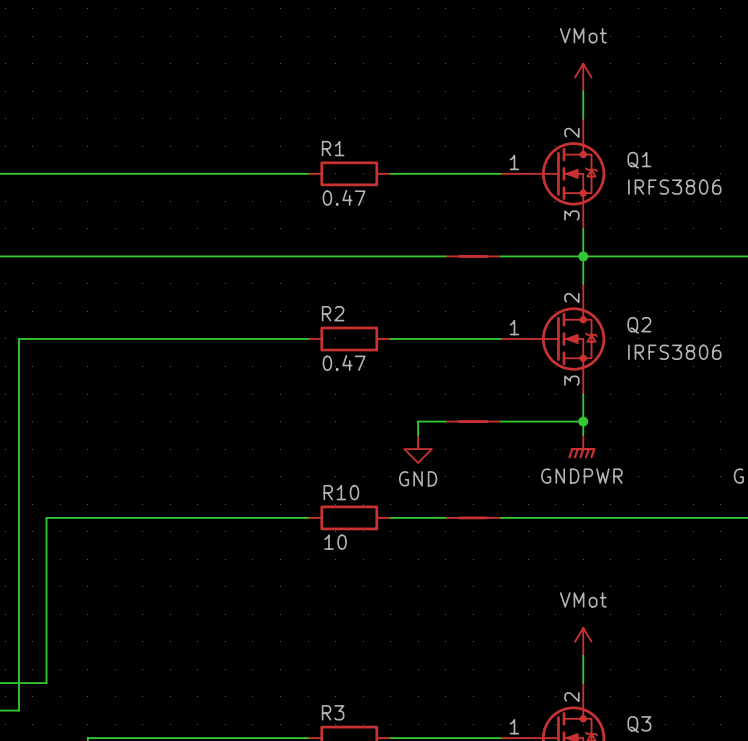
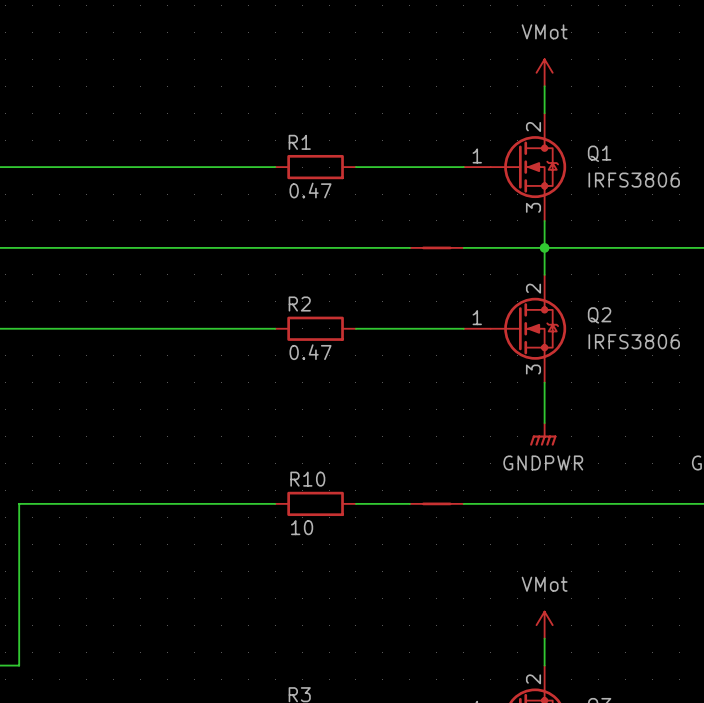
wire: (445, 421) (418, 421) (418, 435) -> none
part: (473, 421) -> none
wire: (500, 421) (583, 421) -> none
junction: (583, 421) -> none
power symbol: GND (418, 449) -> none

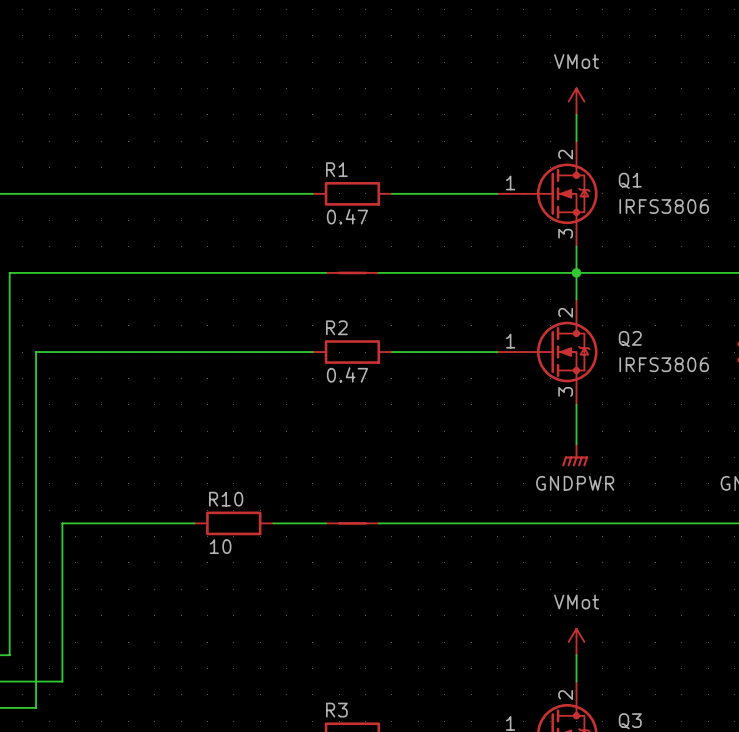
part position: (436, 247) -> (352, 272)
wire: (153, 503) (234, 503) -> none
R10 position: (315, 503) -> (233, 523)
part position: (436, 503) -> (352, 523)

